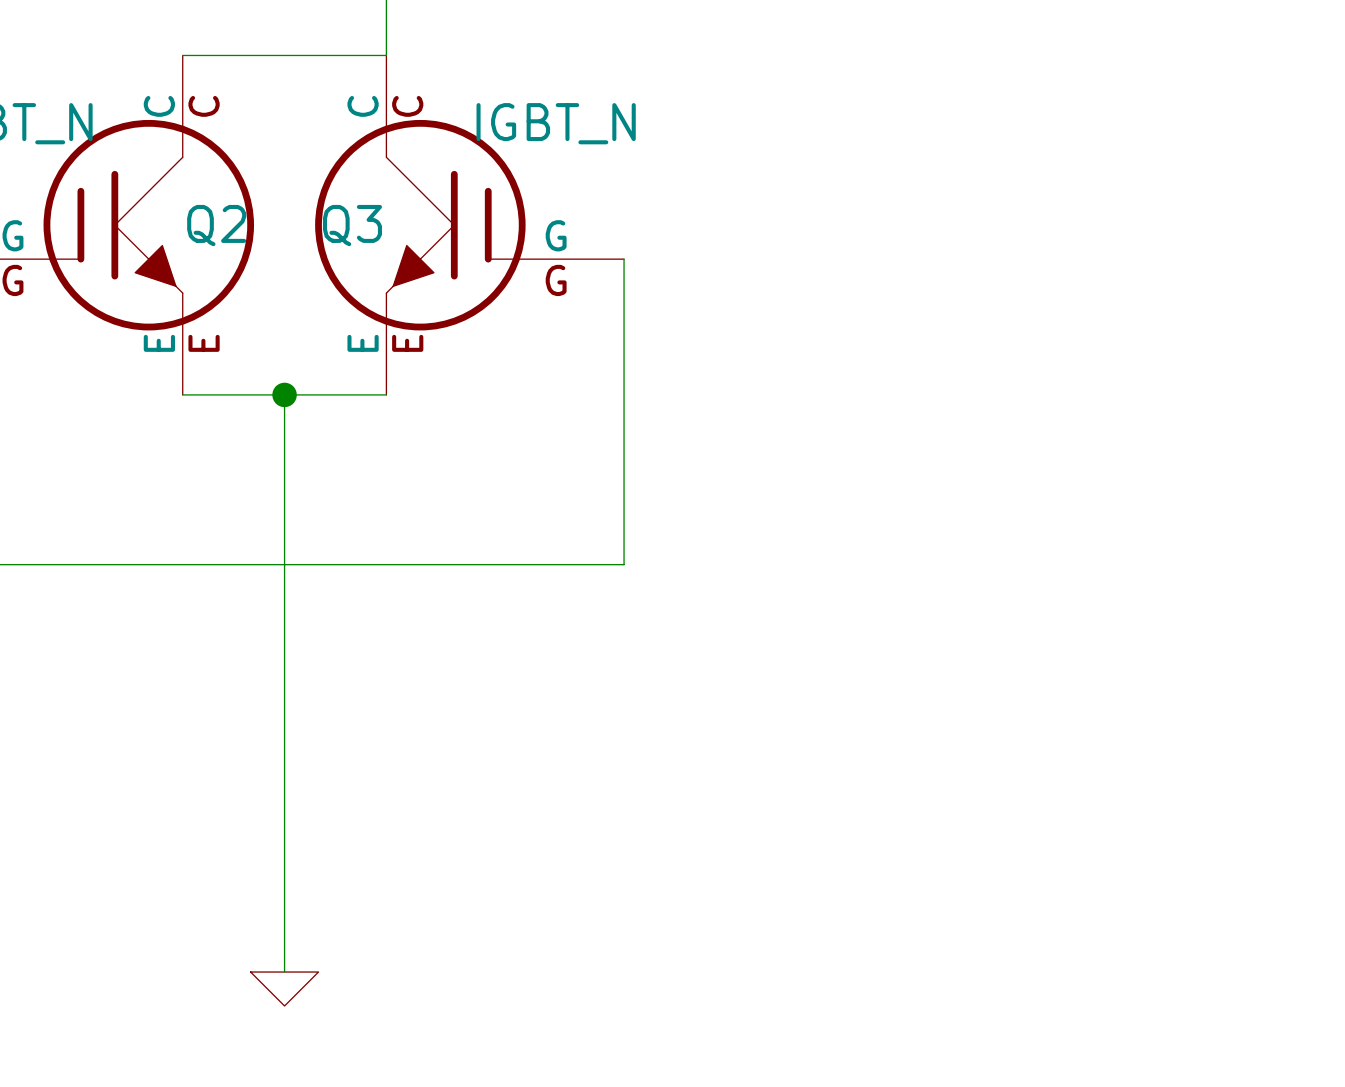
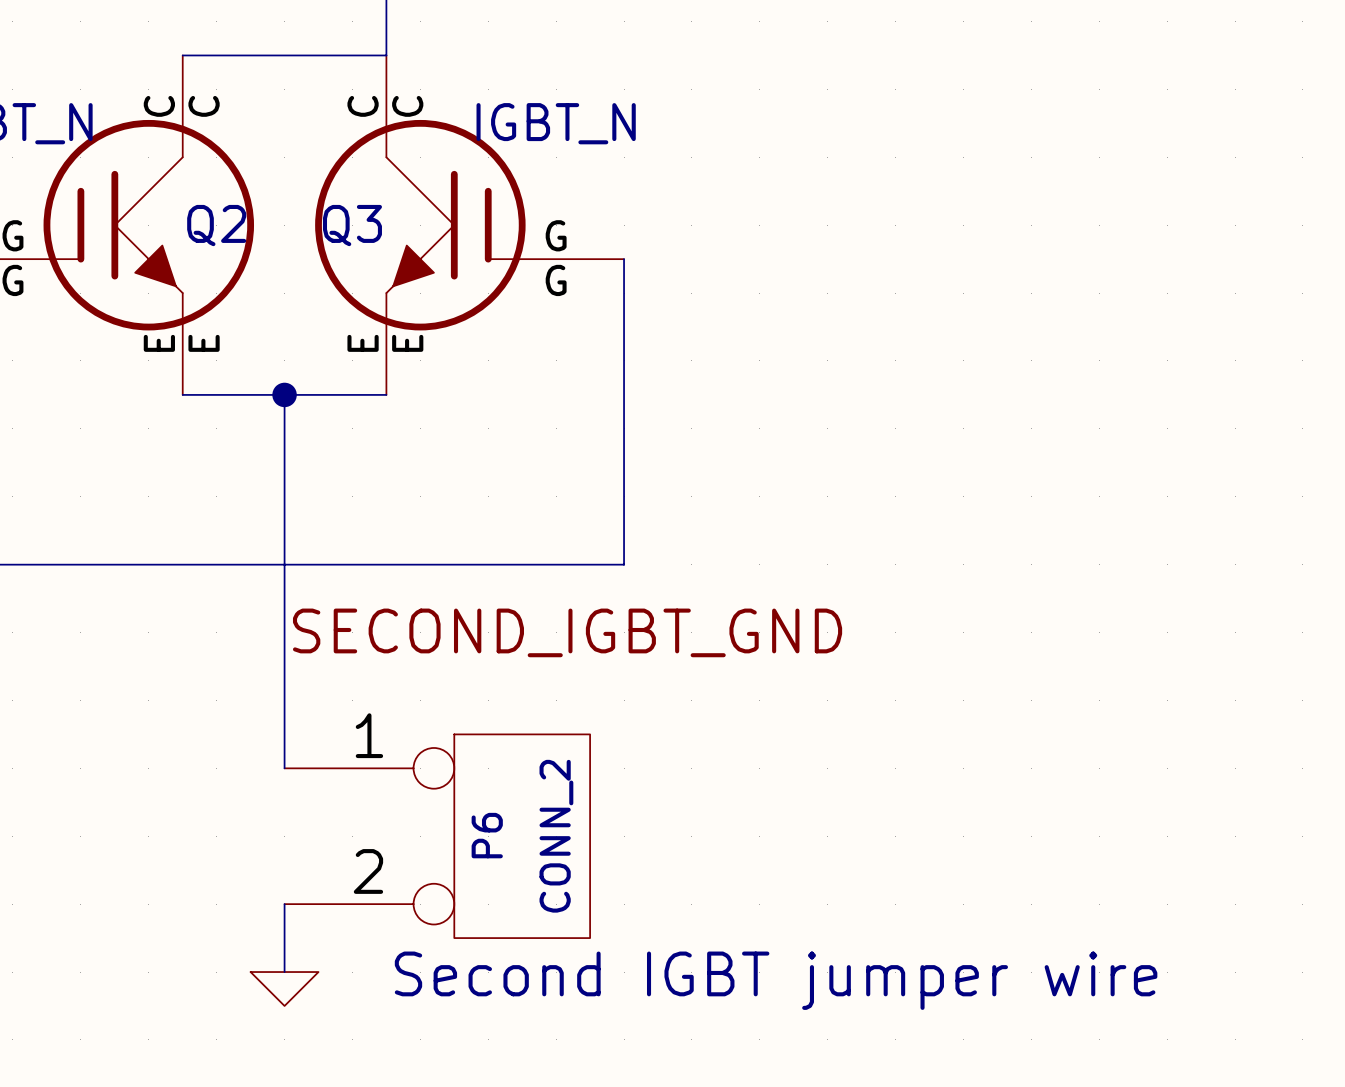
label: none -> SECOND_IGBT_GND (567, 632)
wire: (284, 768) (284, 904) -> none
P6: none -> CONN_2 (437, 836)
text: none -> Second IGBT jumper wire (776, 980)

